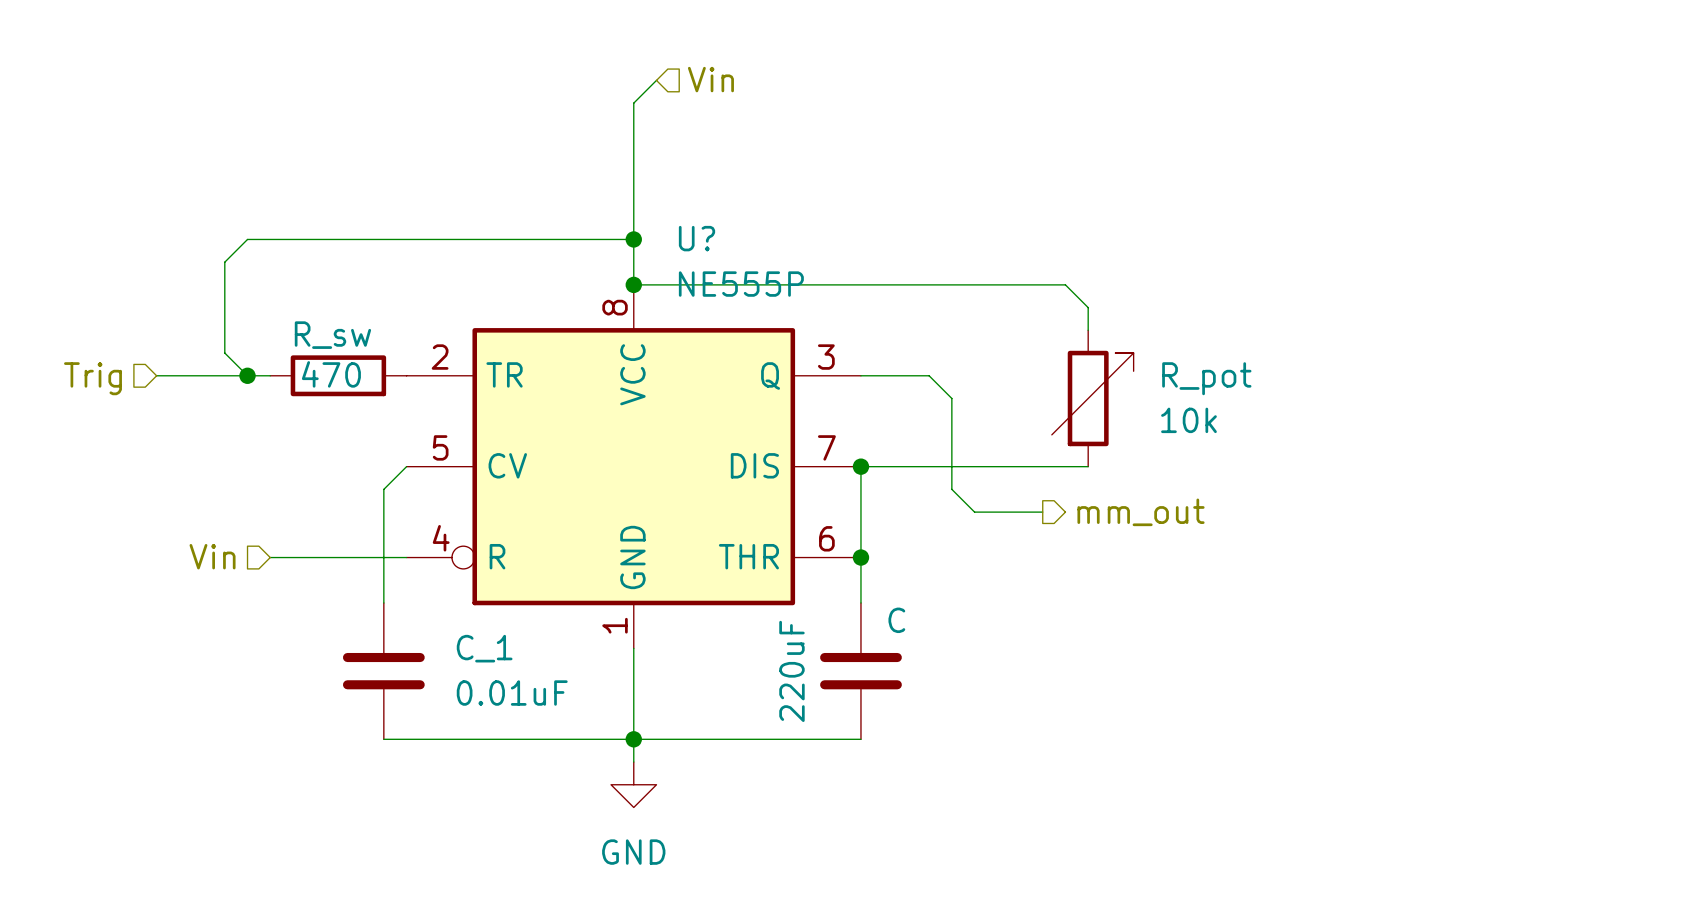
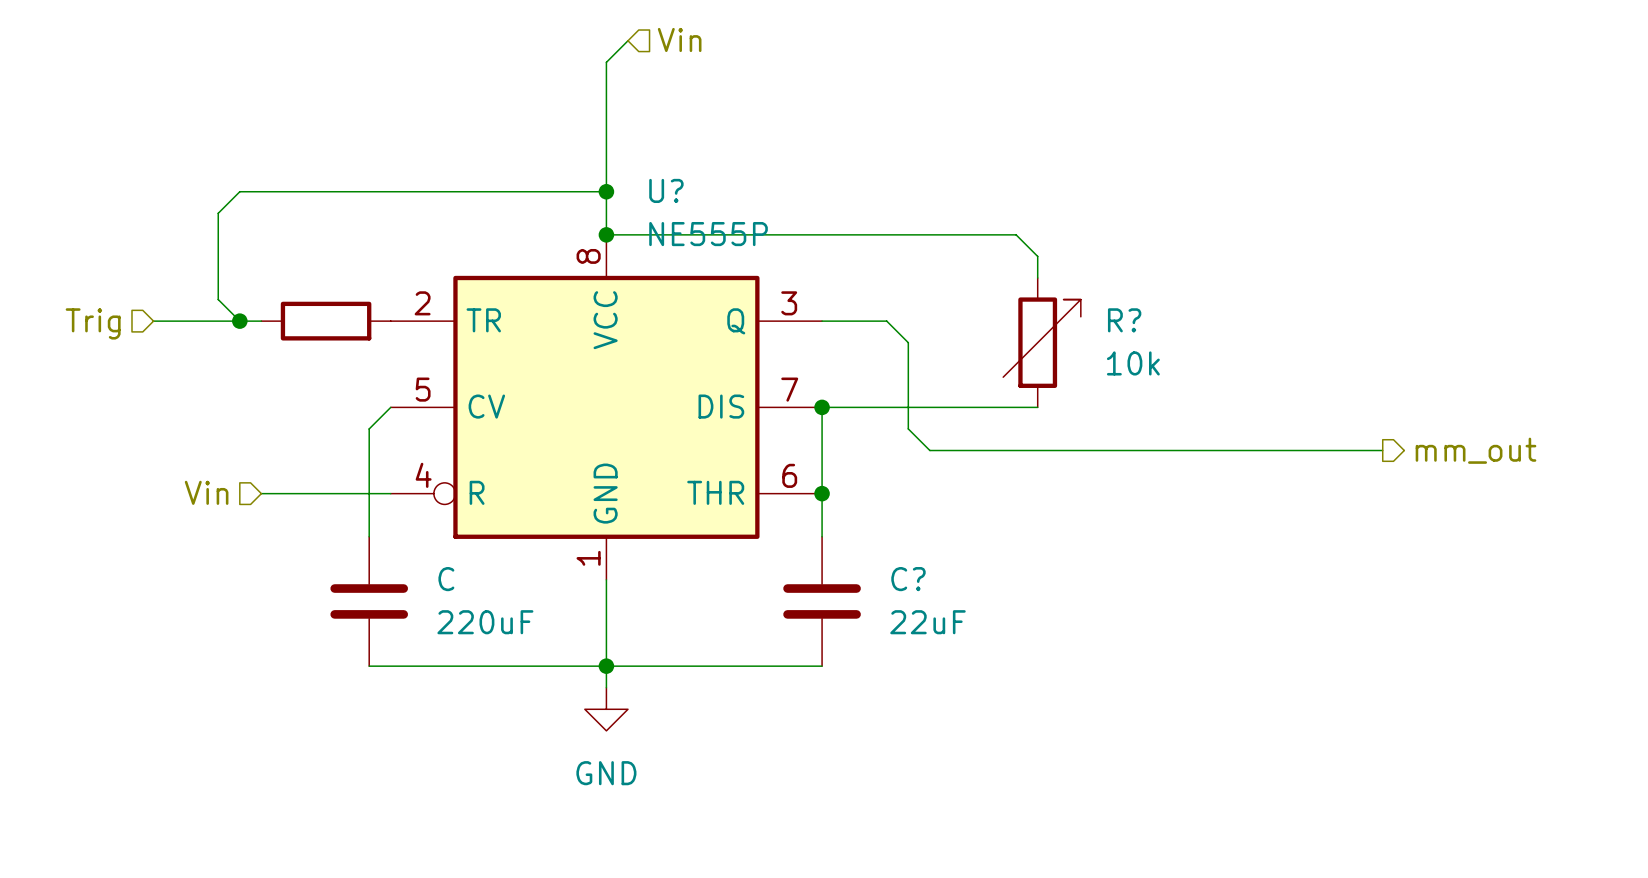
R_sw name: R_sw (332, 335) -> none
R_sw value: 470 (331, 374) -> none
R_pot name: R_pot (1206, 378) -> R? (1124, 320)
wire: none -> (994, 450) (1382, 450)
hierarchical label position: mm_out (1141, 512) -> mm_out (1476, 450)
C name: C (896, 620) -> C? (908, 579)
C_1 name: C_1 (484, 648) -> C (446, 579)
C value: 220uF (791, 671) -> 22uF (927, 622)
C_1 value: 0.01uF (512, 693) -> 220uF (485, 622)

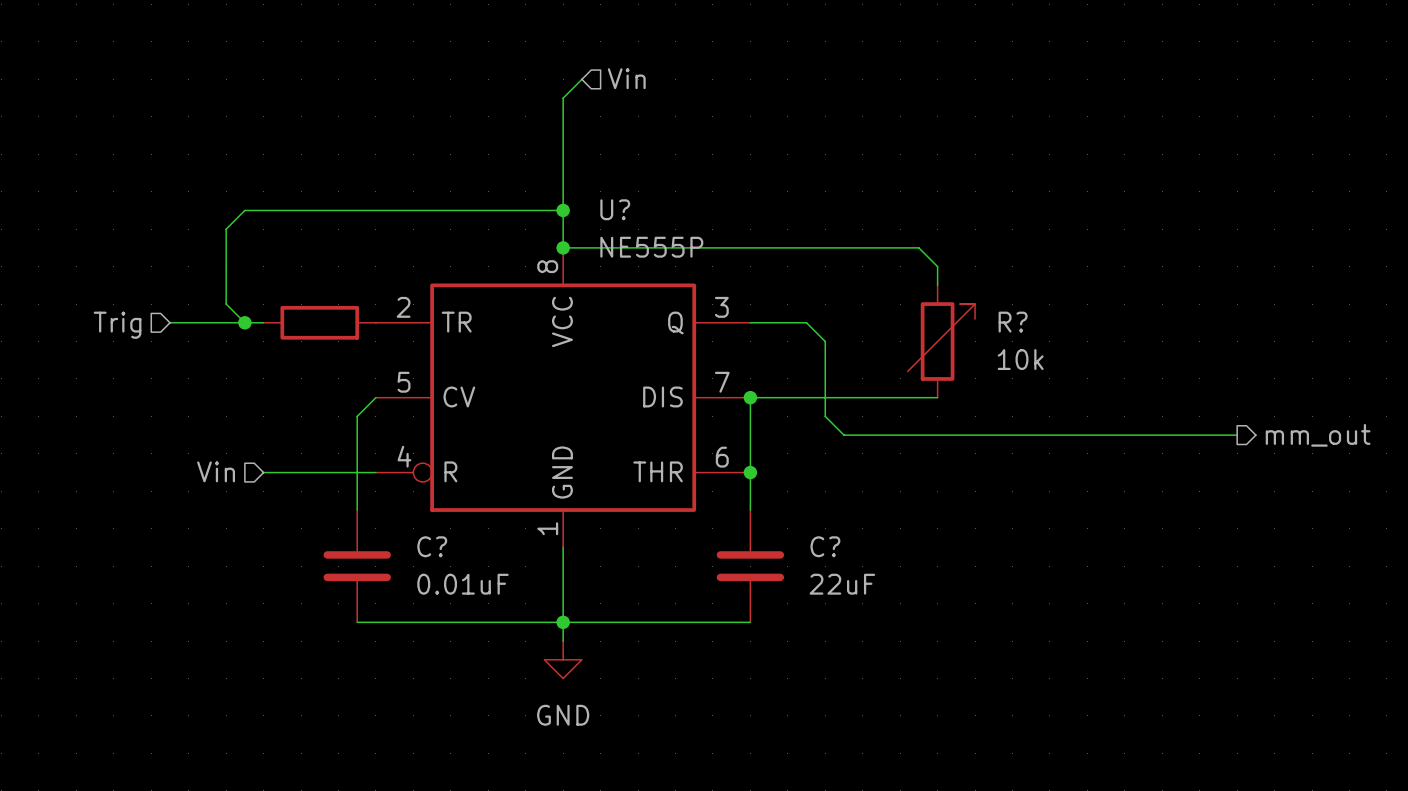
C name: C (446, 579) -> C? (432, 546)
C value: 220uF (485, 622) -> 0.01uF (463, 584)

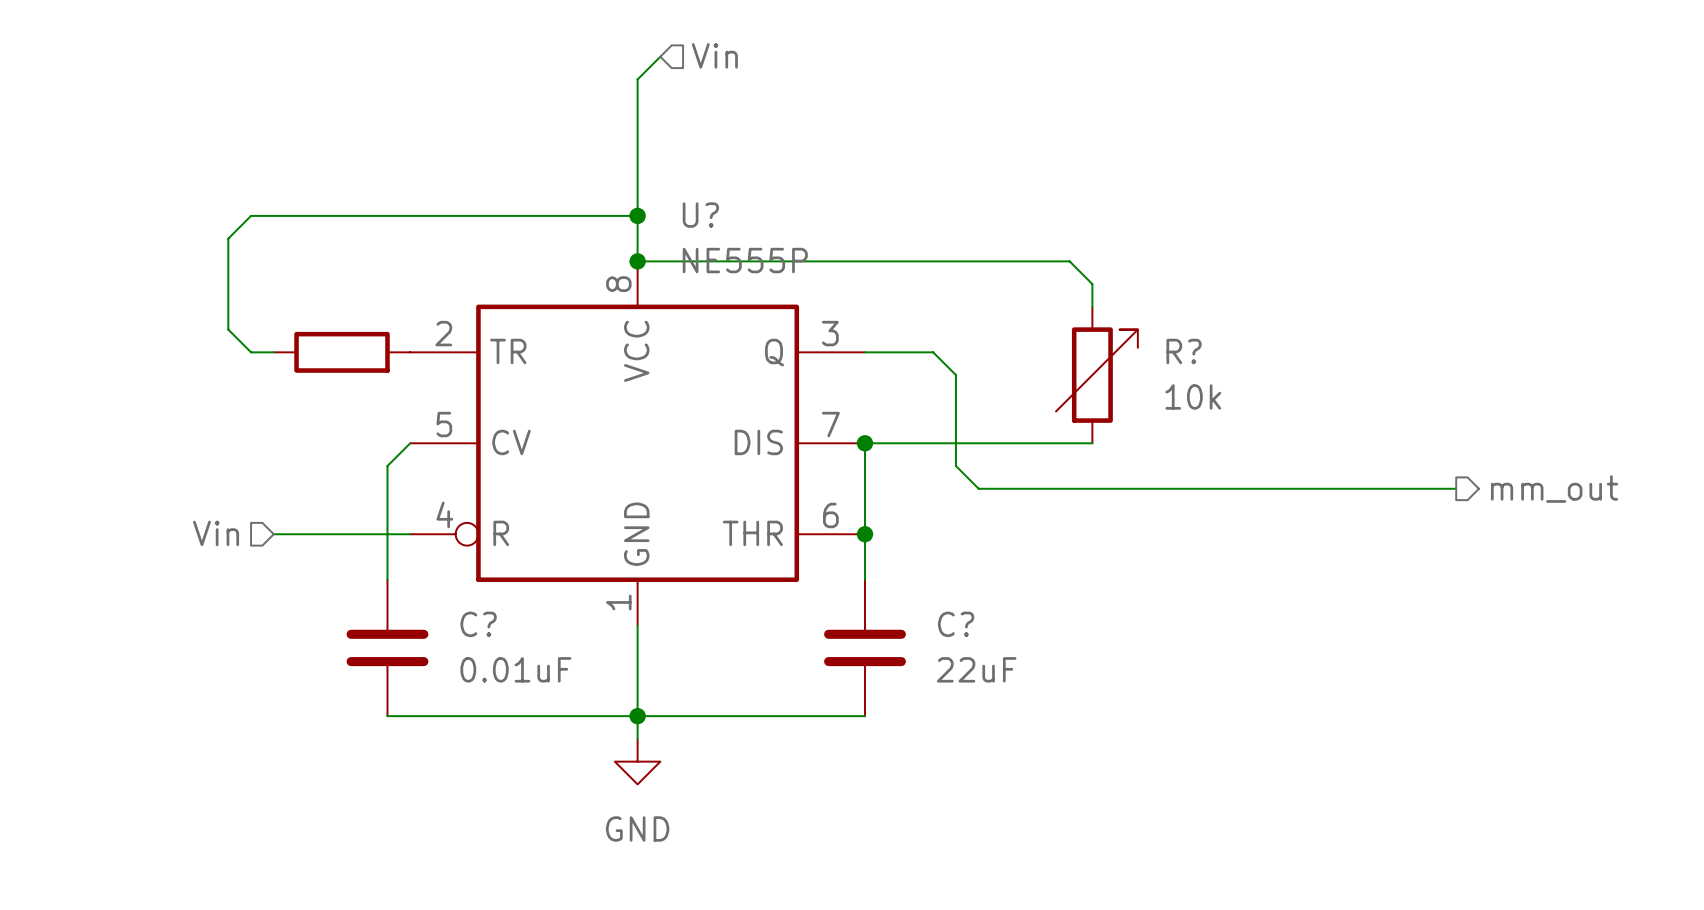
wire: (169, 322) (244, 322) -> none
junction: (244, 322) -> none
hierarchical label: Trig (117, 325) -> none

